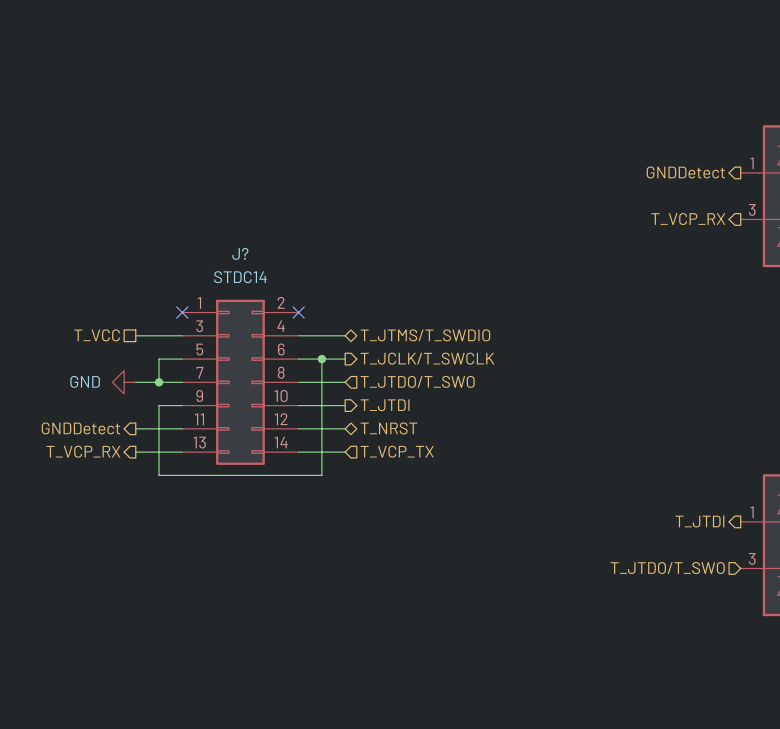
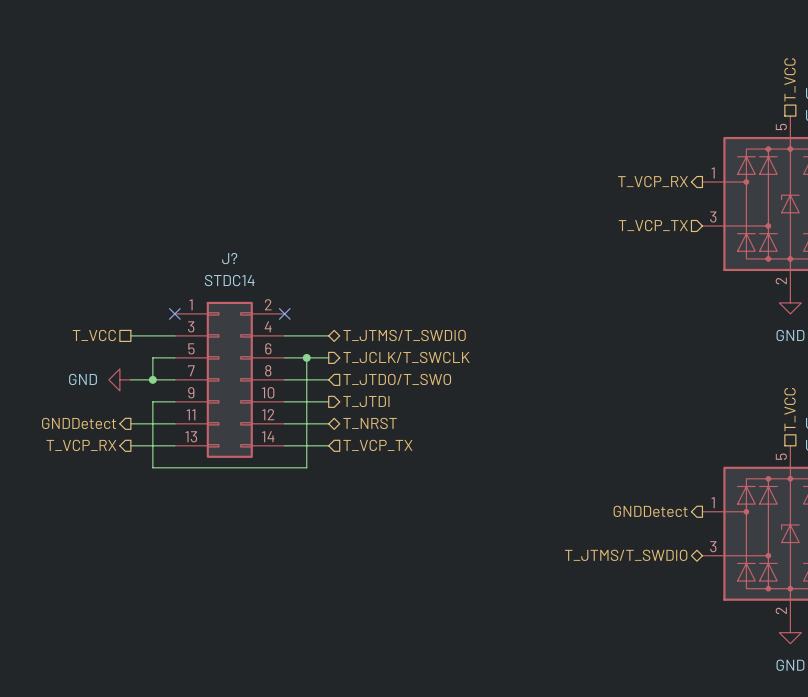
hierarchical label: GNDDetect (685, 172) -> T_VCP_RX (652, 181)
hierarchical label shape: output (688, 219) -> input (653, 225)
hierarchical label: T_VCP_RX (688, 219) -> T_VCP_TX (653, 225)
hierarchical label: T_JTDI (699, 521) -> GNDDetect (650, 511)
hierarchical label shape: input (667, 568) -> bidirectional (626, 555)
hierarchical label: T_JTDO/T_SWO (667, 568) -> T_JTMS/T_SWDIO (626, 555)

